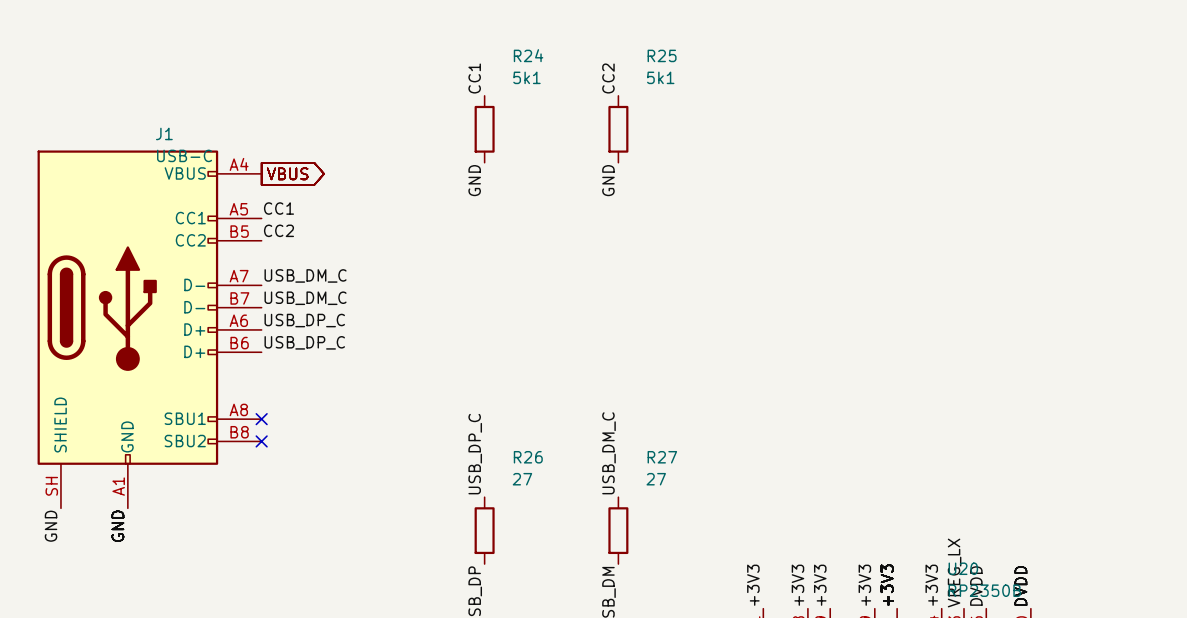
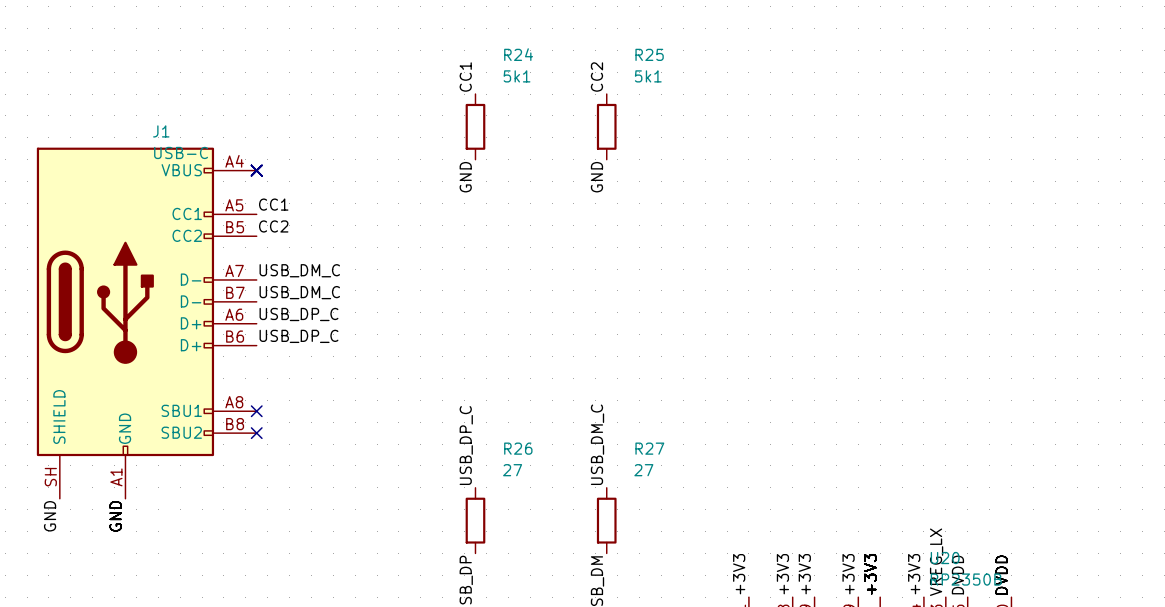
no-connect mark: none -> (256, 170)
global label: VBUS (287, 173) -> none

